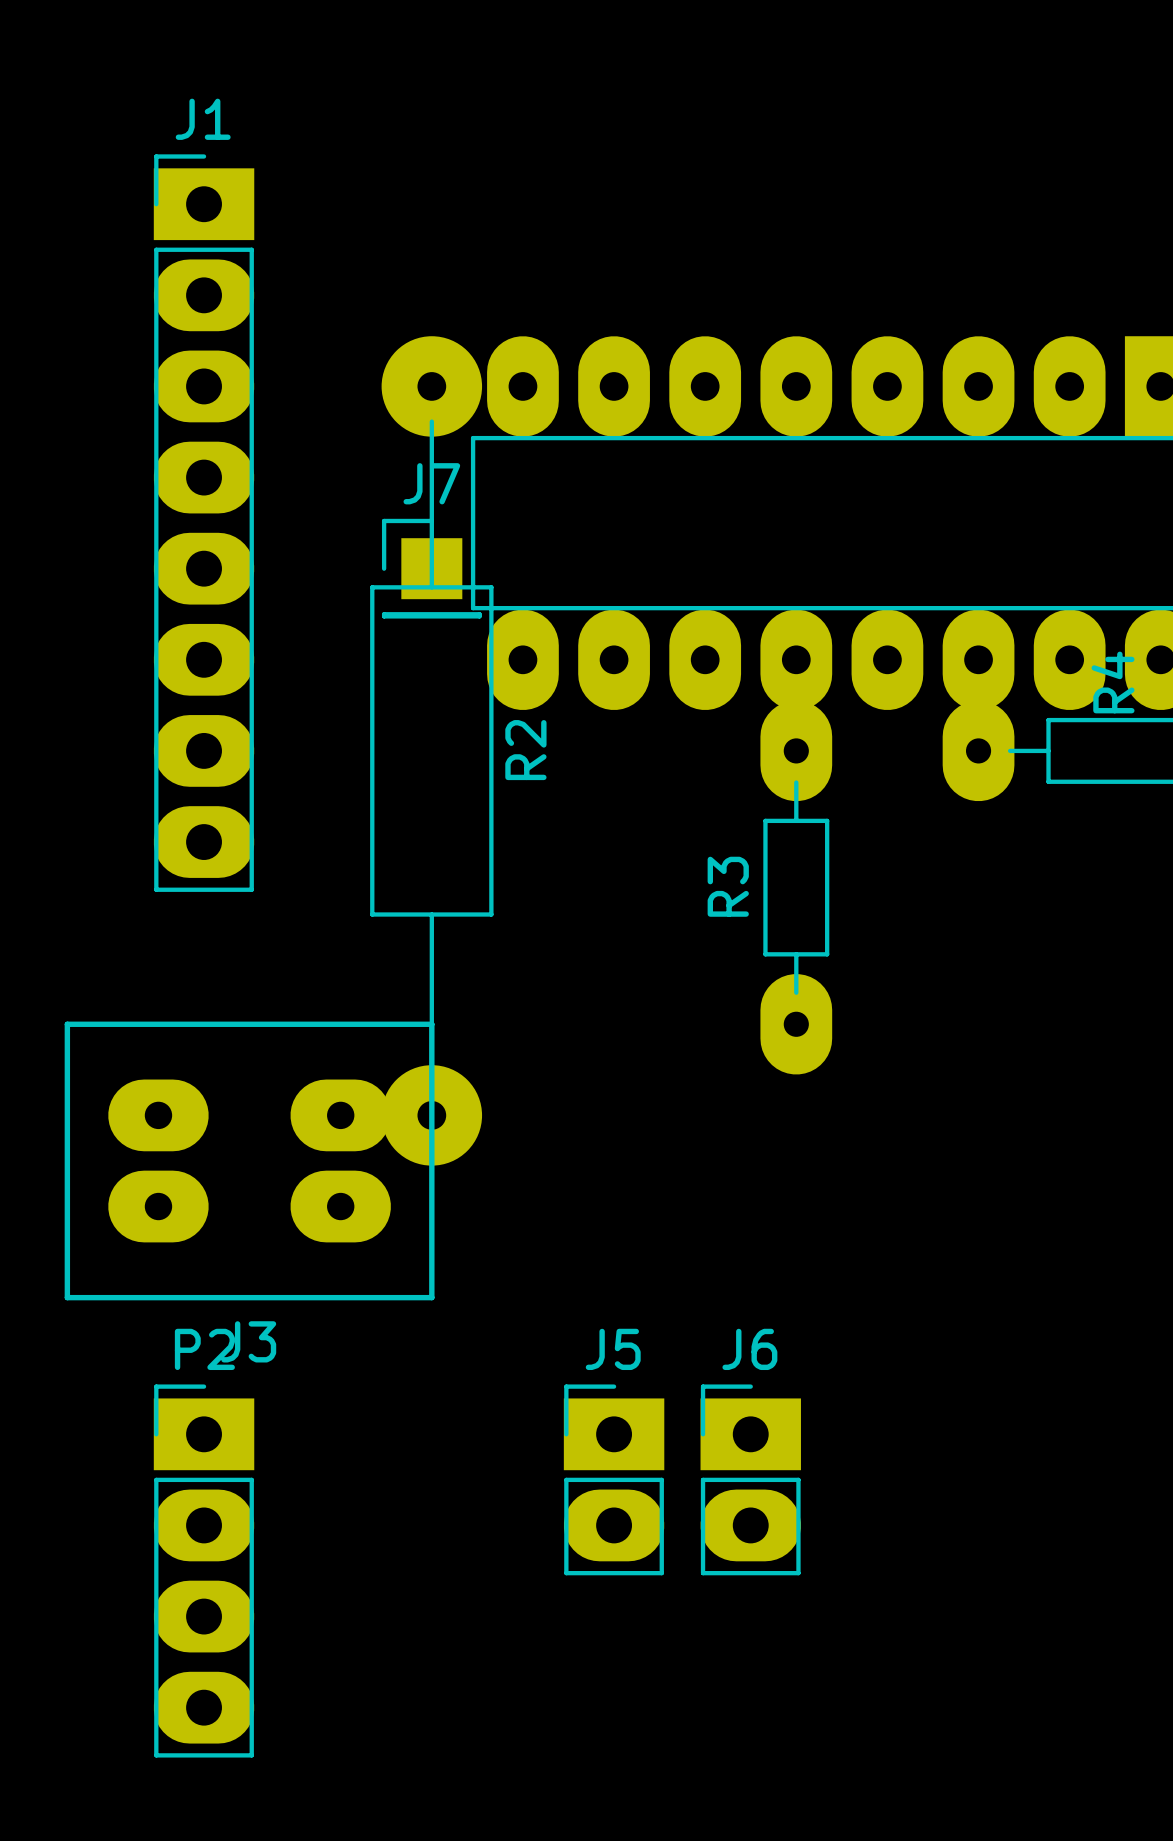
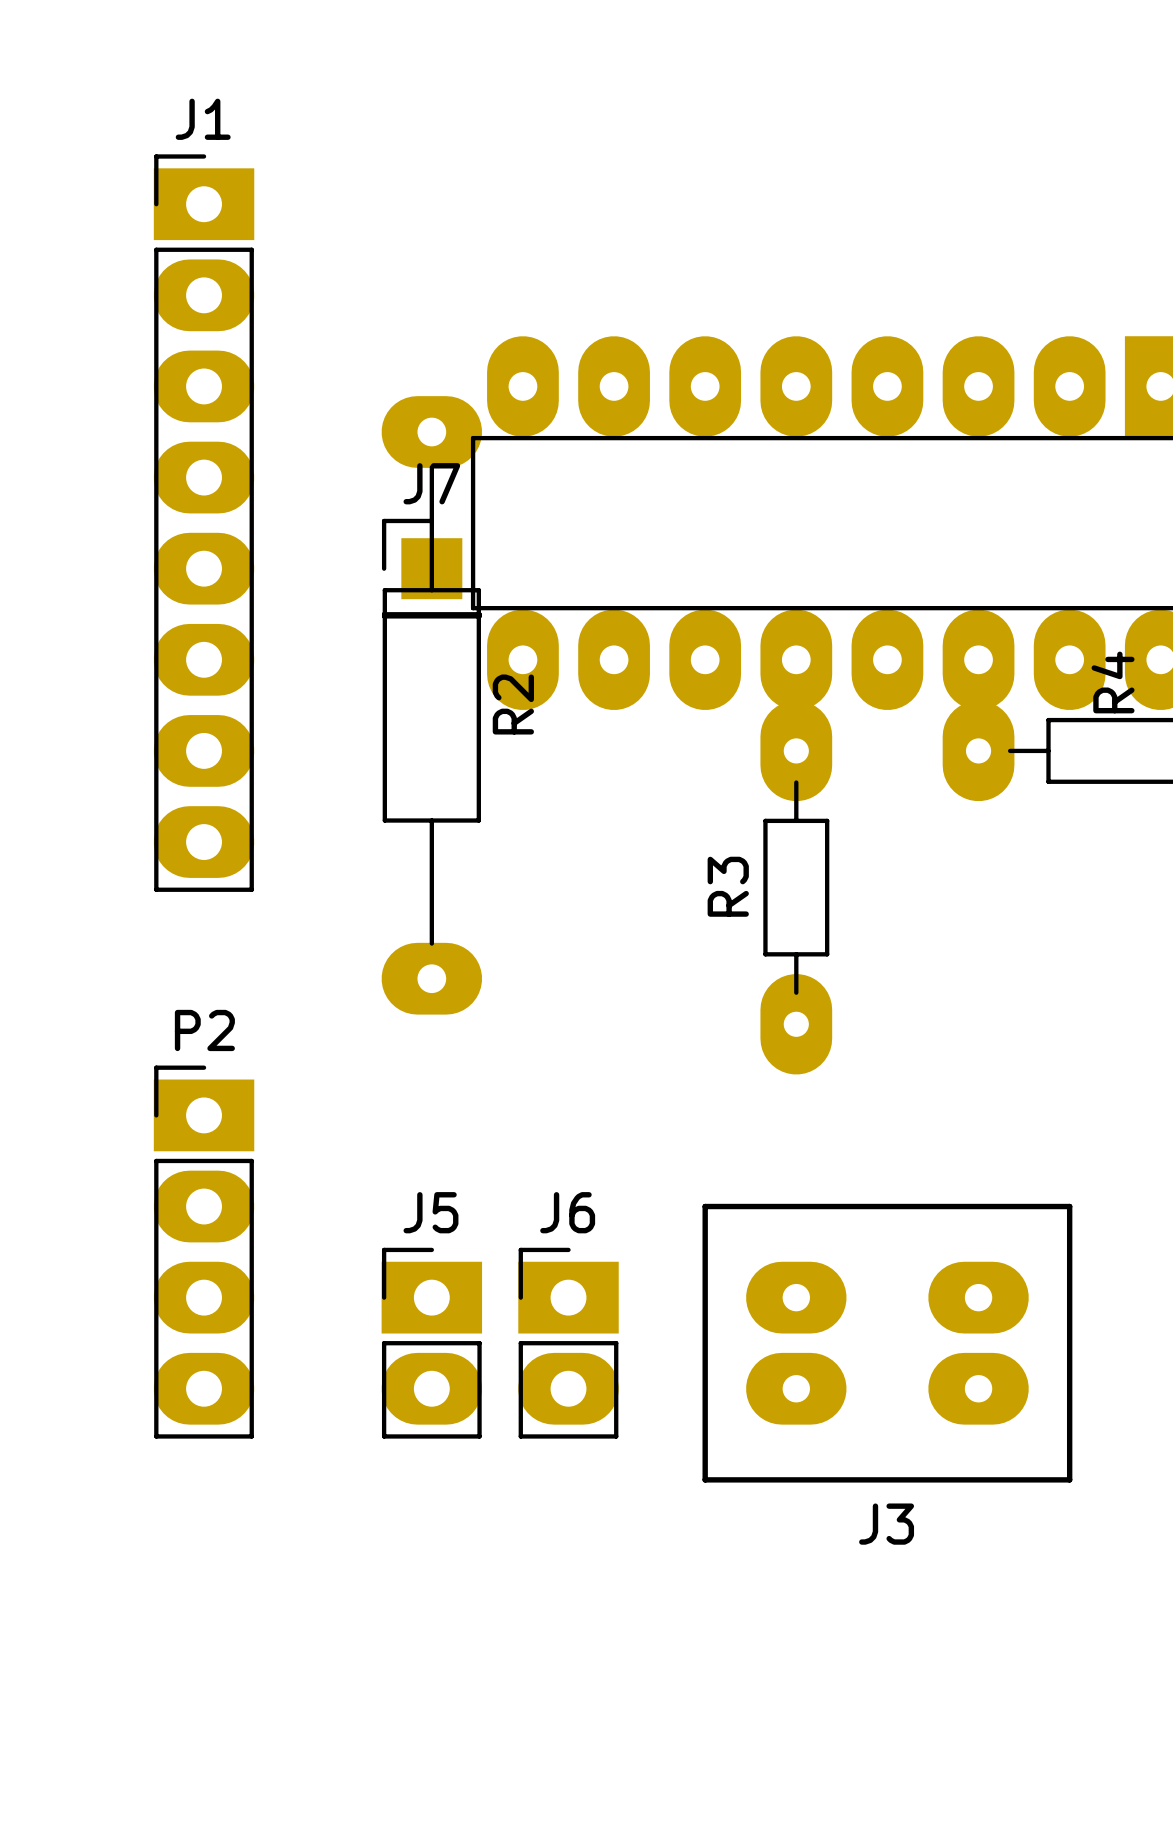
R2 footprint: [370, 336, 494, 1166] -> [381, 396, 483, 1015]
J3 position: (249, 1160) -> (887, 1343)
J5 position: (614, 1479) -> (431, 1343)
J6 position: (750, 1479) -> (568, 1343)
P2 position: (204, 1571) -> (204, 1252)

